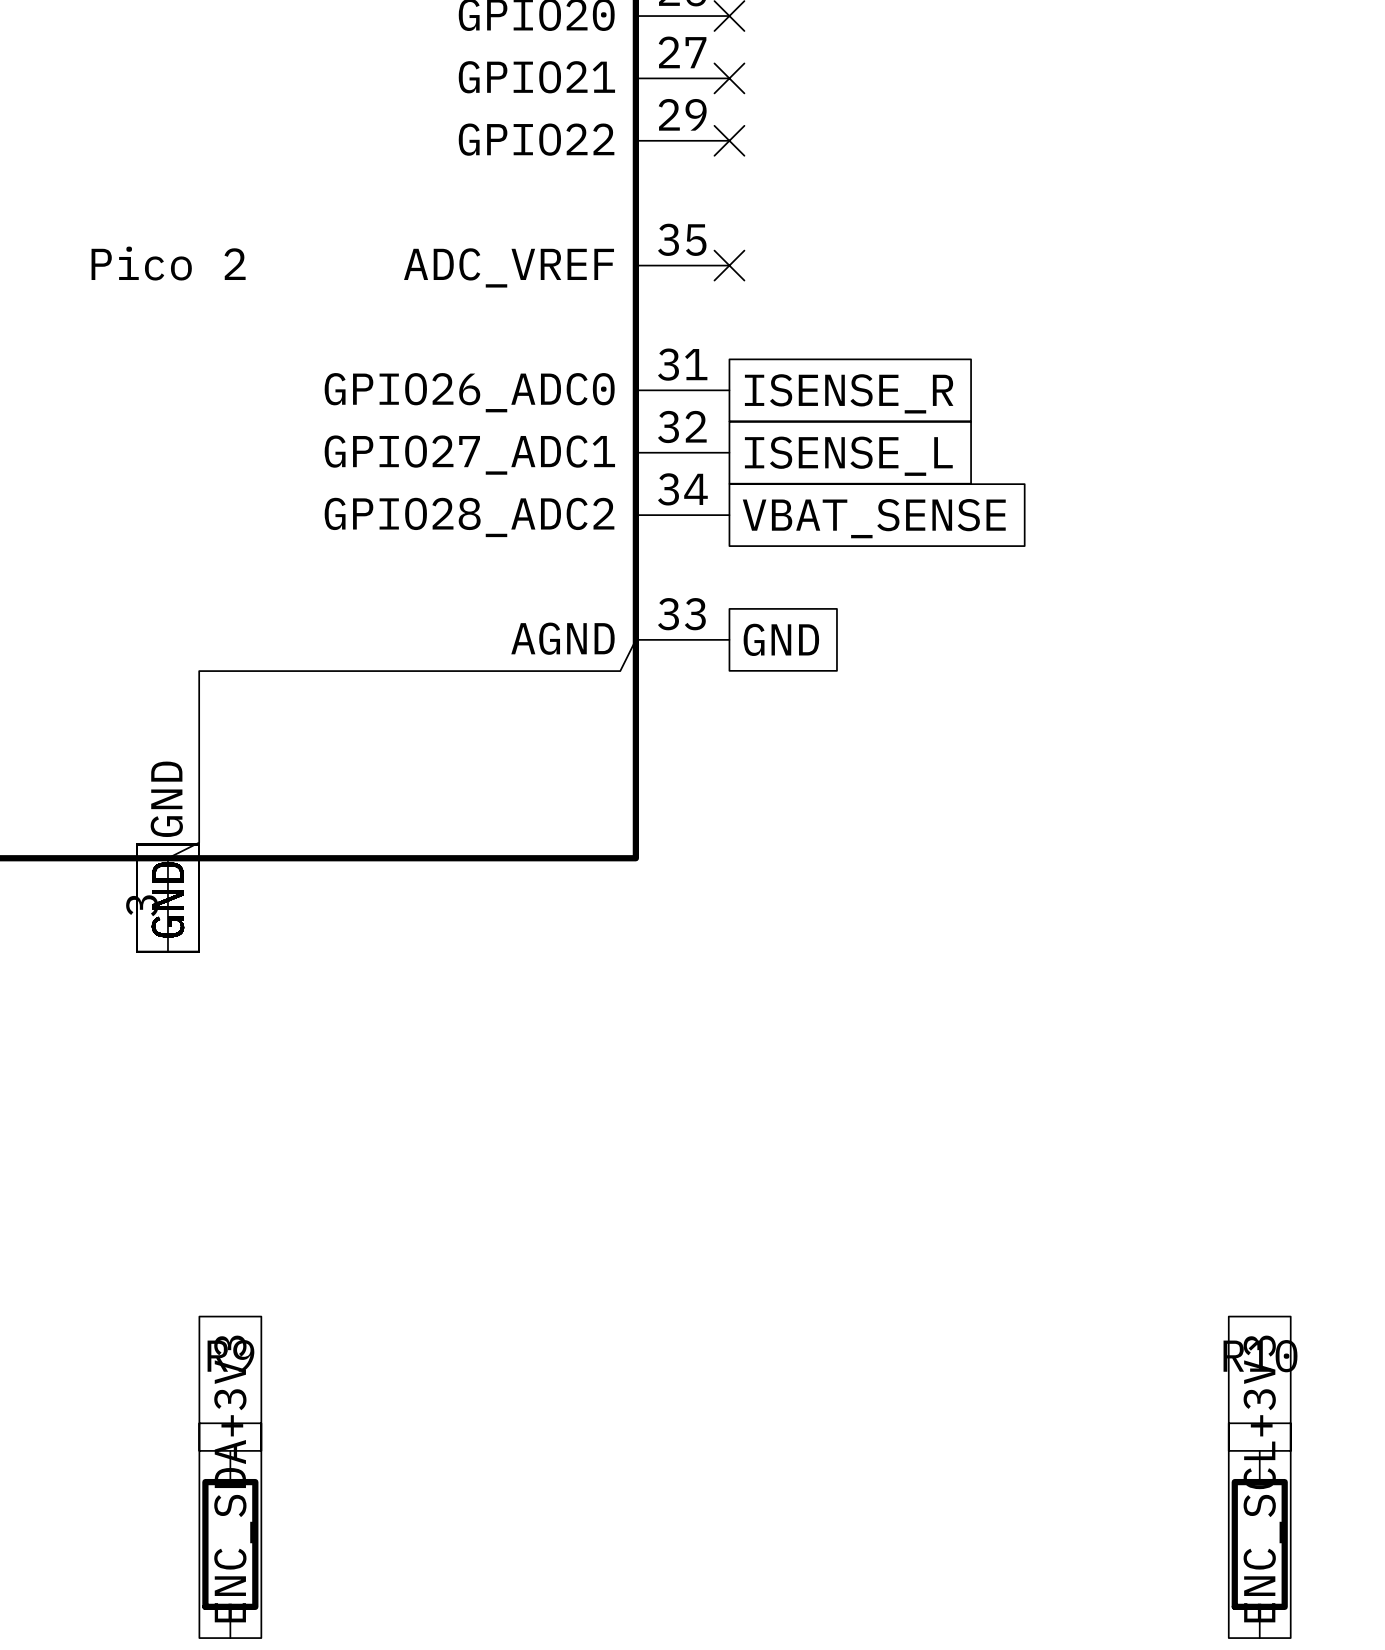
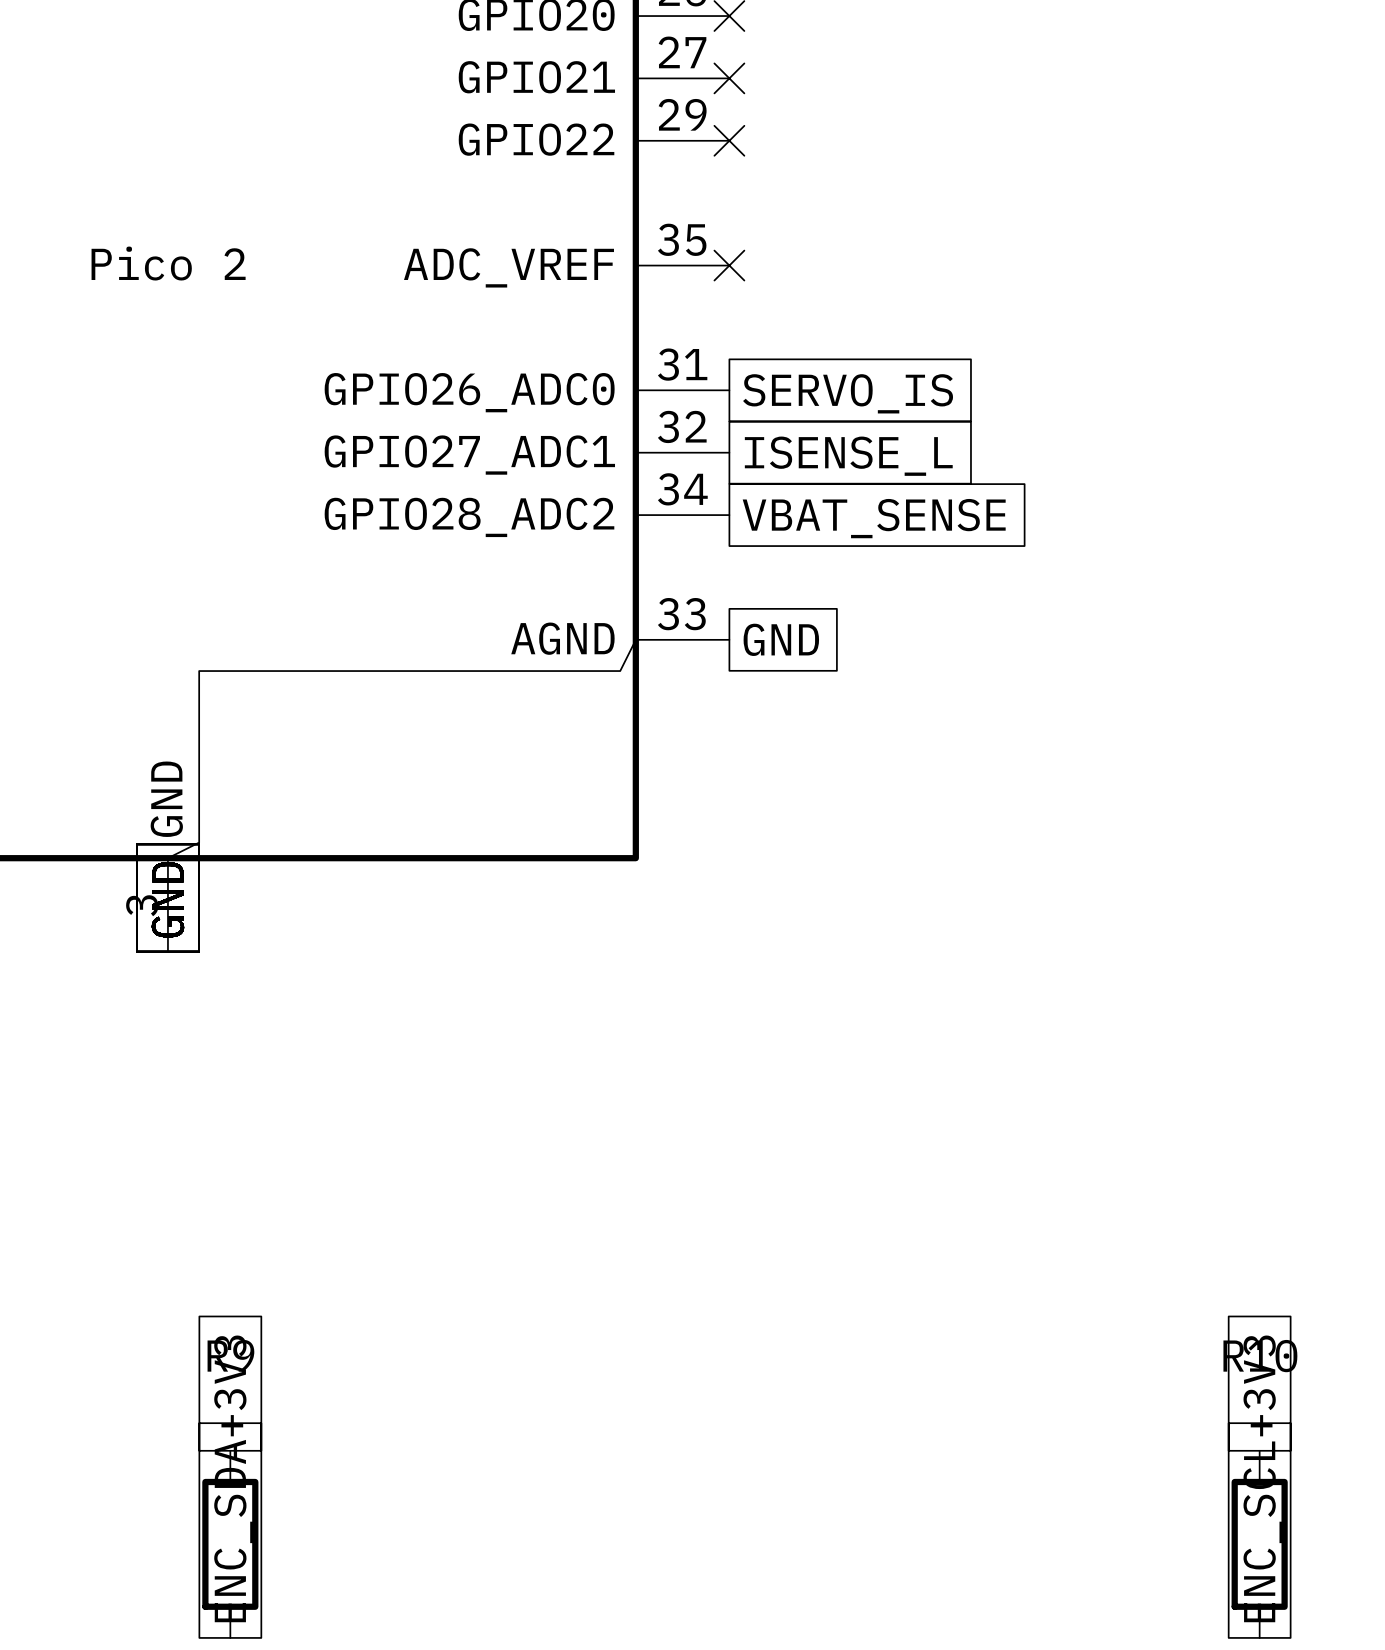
global label: ISENSE_R (849, 393) -> SERVO_IS (848, 393)

